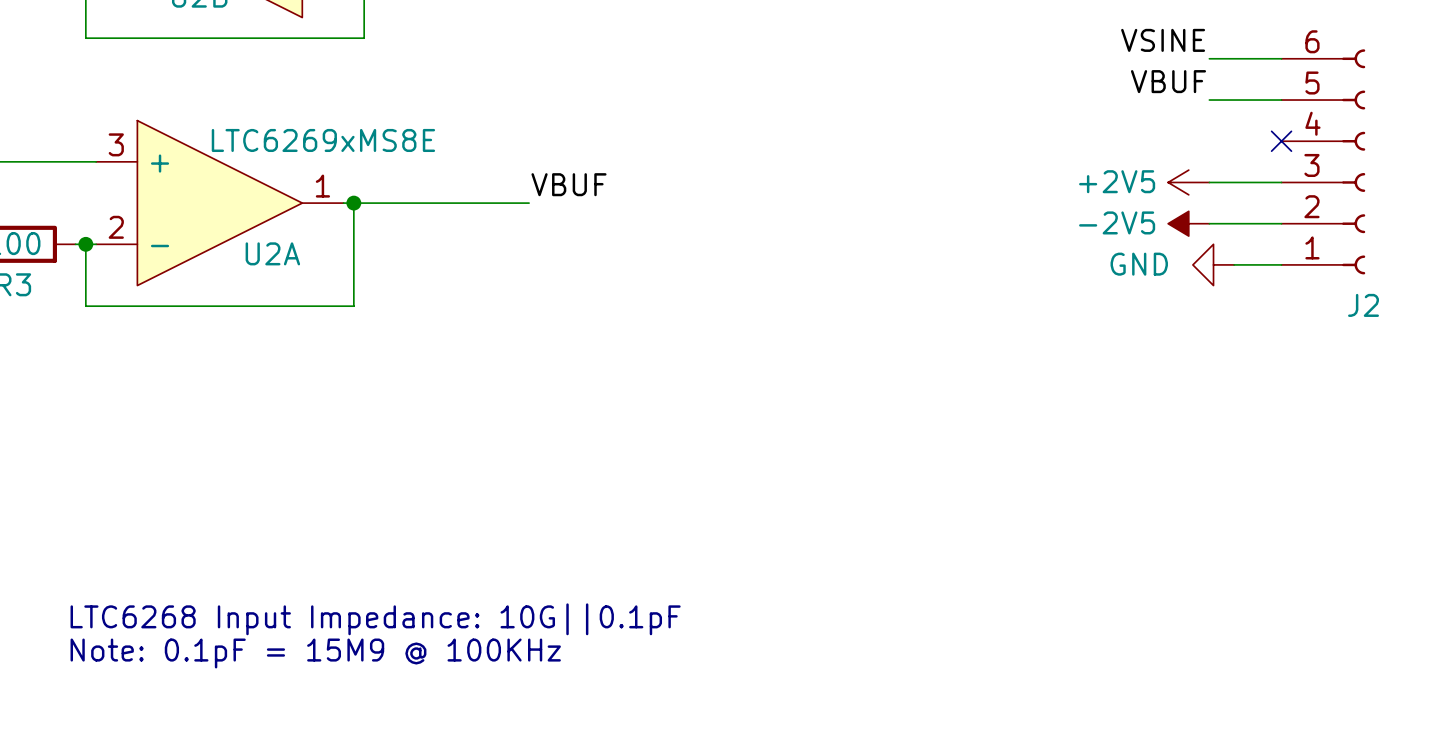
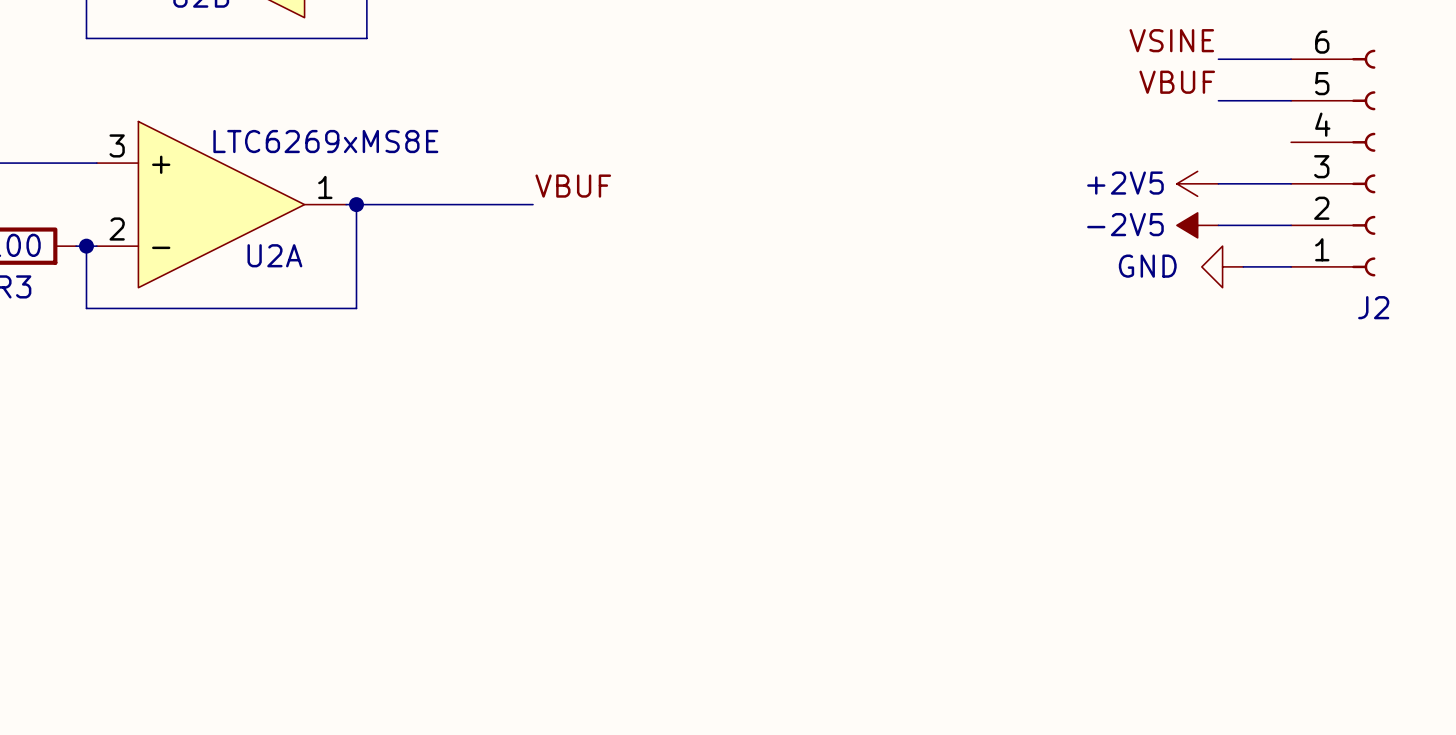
no-connect mark: (1281, 141) -> none
text: LTC6268 Input Impedance: 10G||0.1pF (375, 619) -> none
text: Note: 0.1pF = 15M9 @ 100KHz (315, 653) -> none

